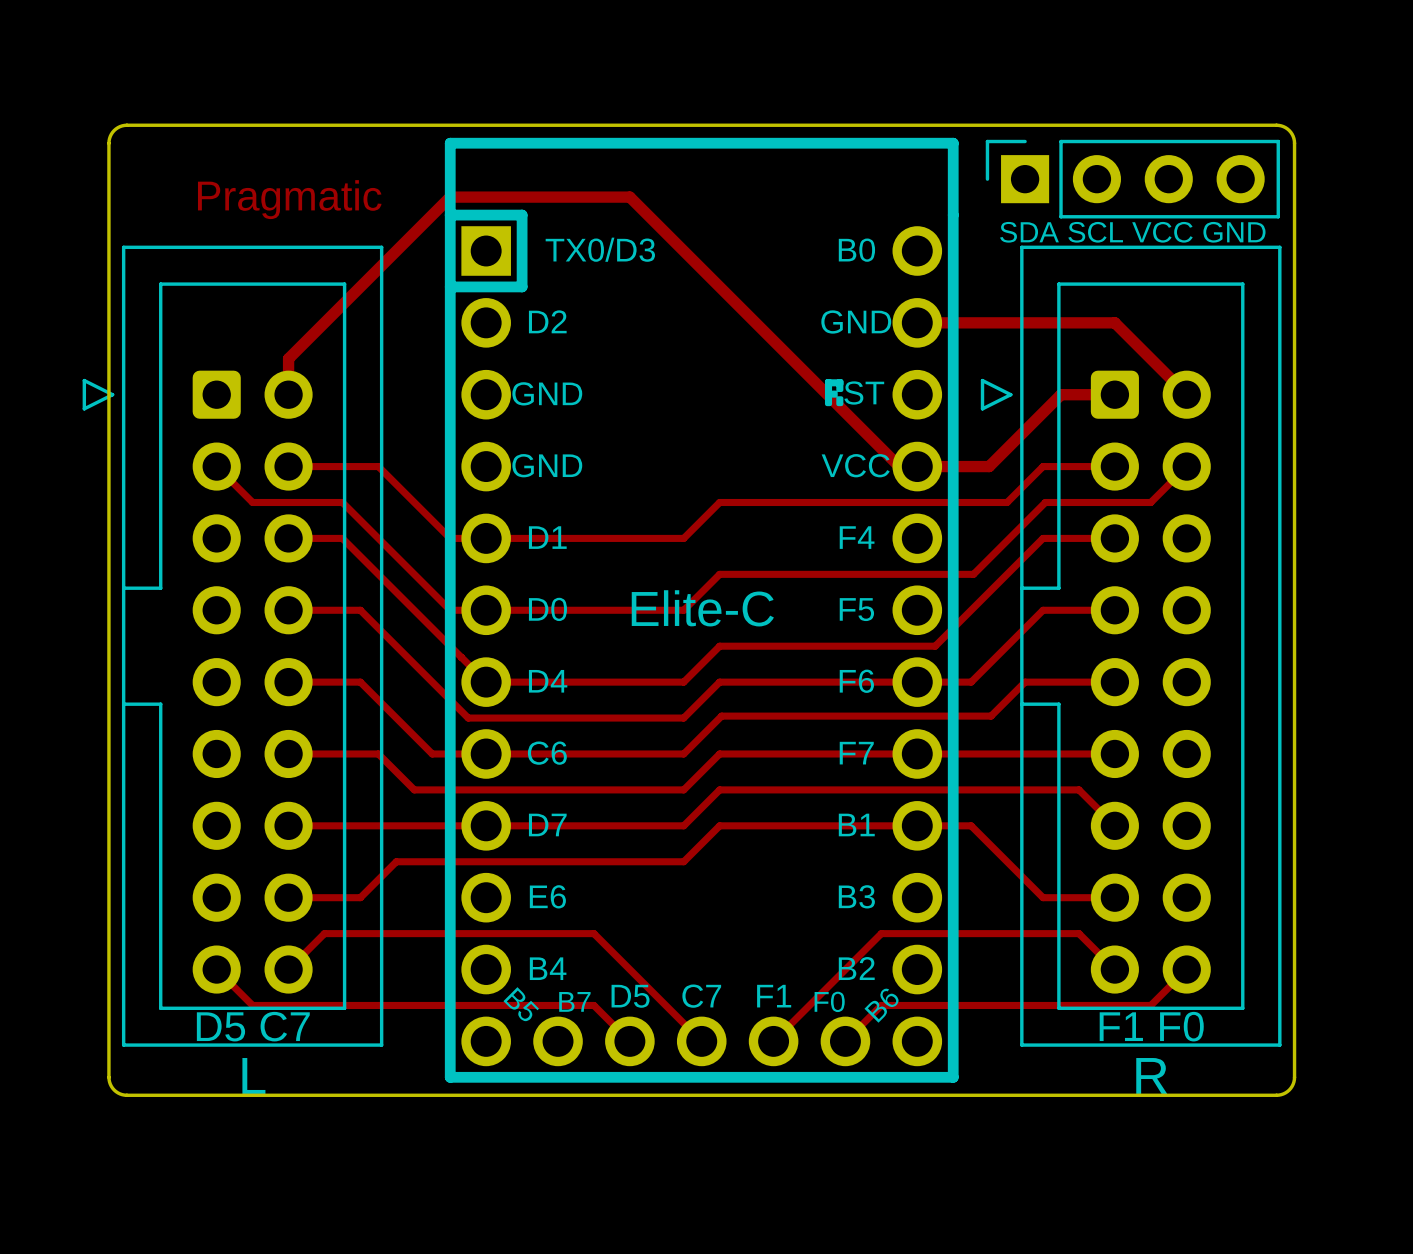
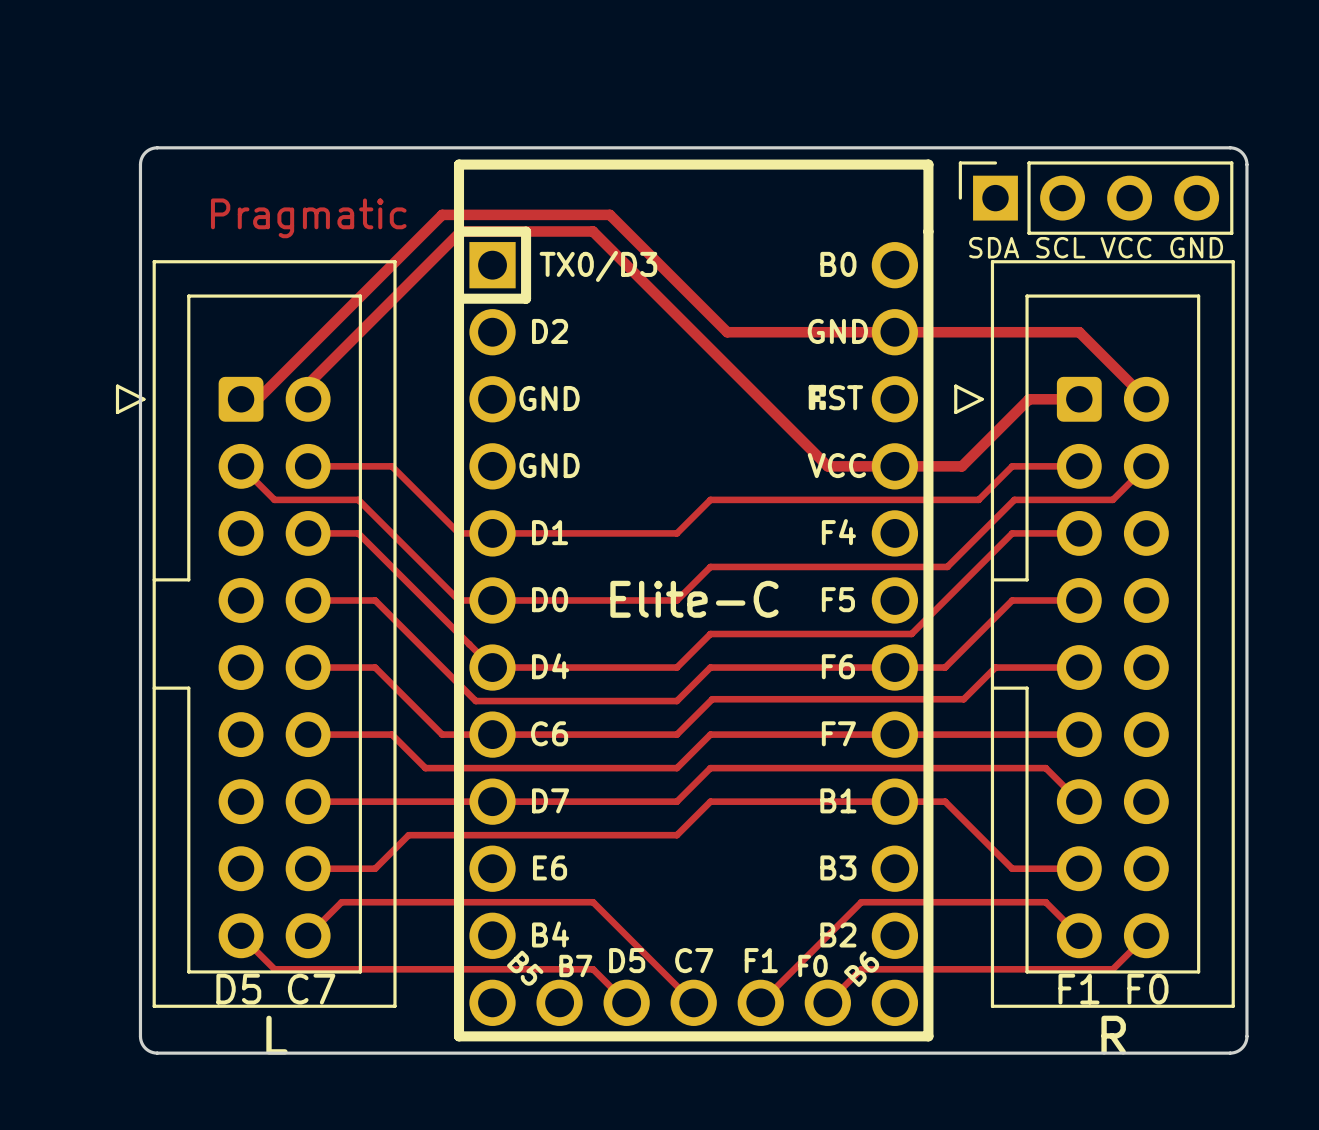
track: (450, 197) (288, 358) (288, 378) -> (459, 214) (442, 214) (257, 399) (241, 399)
track: (611, 197) (629, 197) (899, 466) -> (609, 214) (727, 332) (894, 332)
track: none -> (308, 384) (460, 231) (592, 231) (827, 466) (878, 466)

